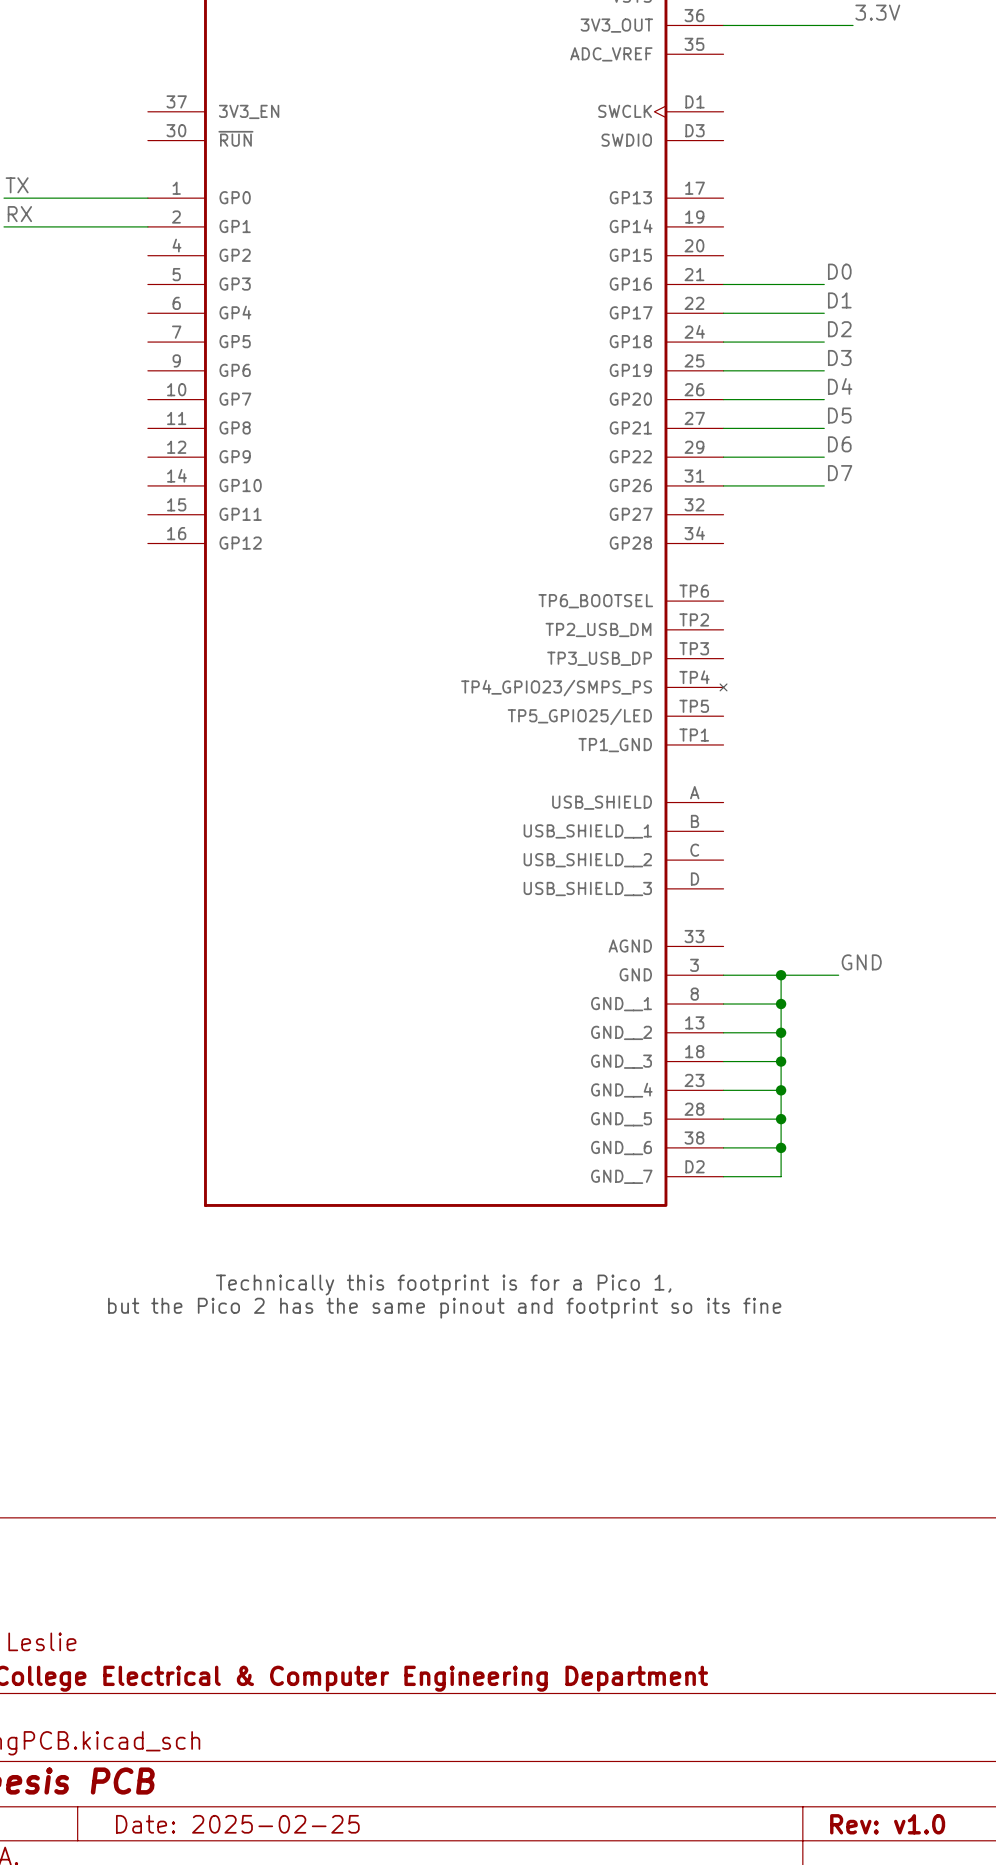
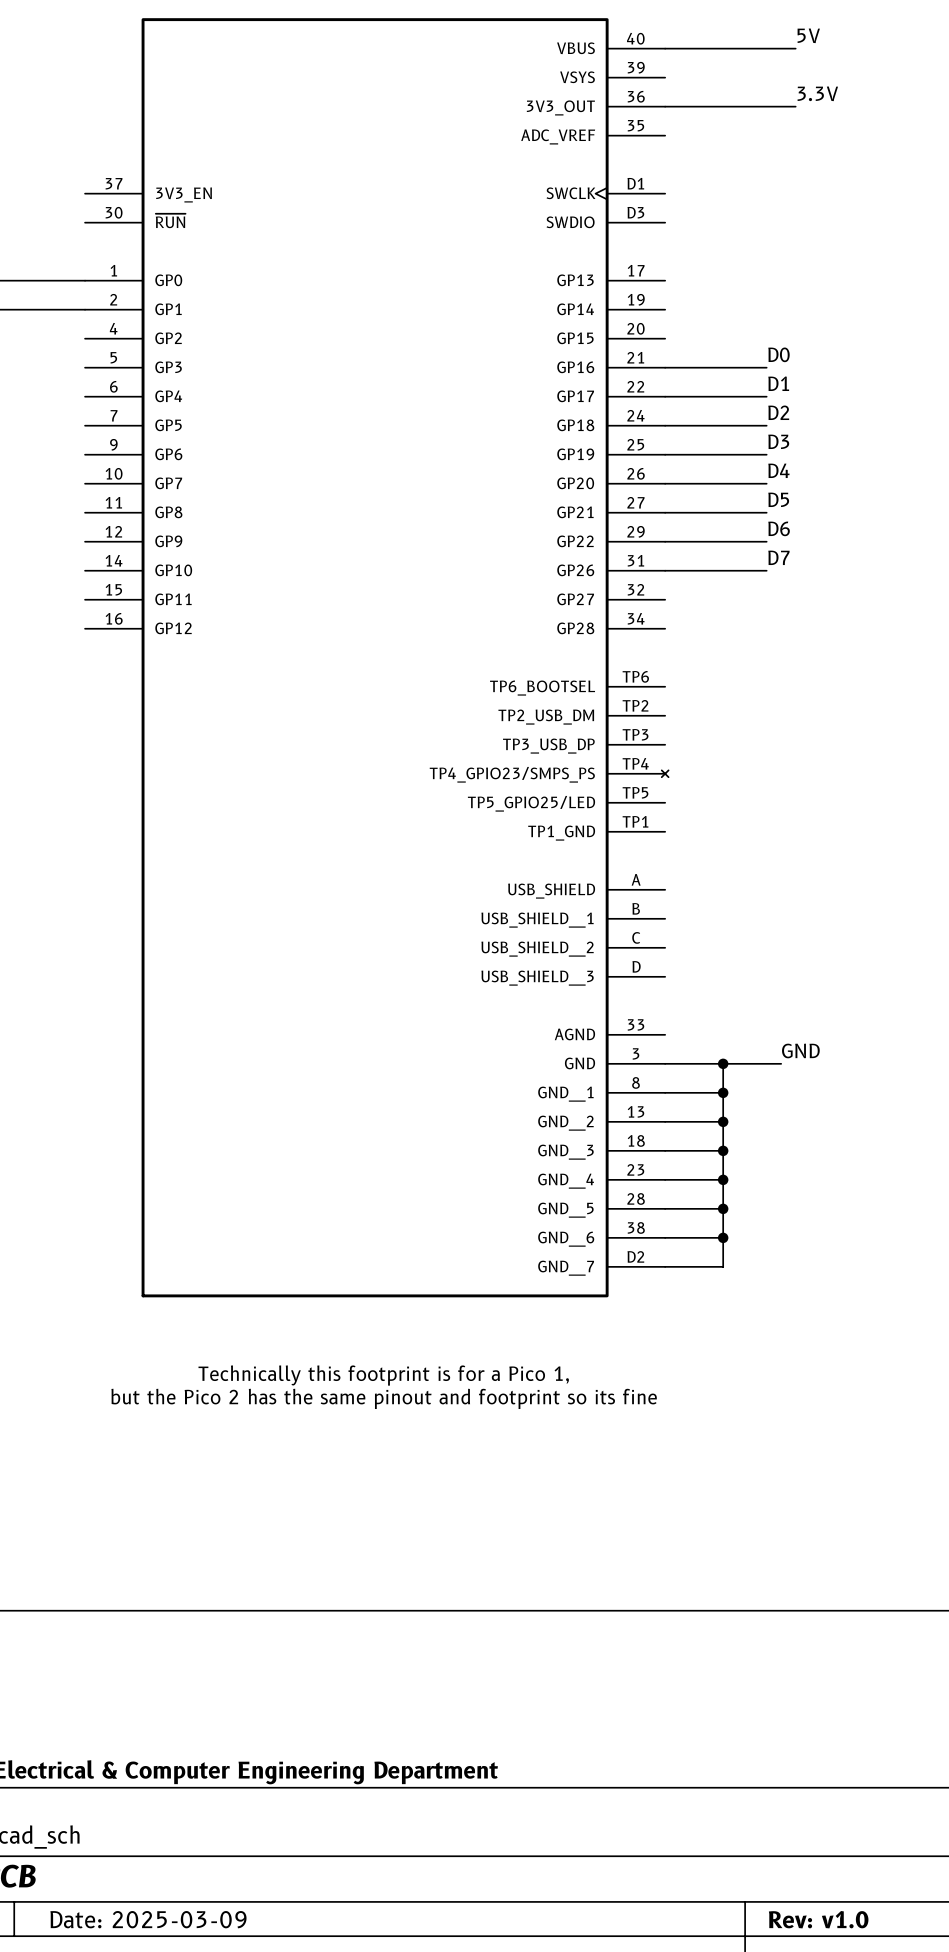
title block: Date: 2025-02-25 (237, 1824) -> Date: 2025-03-09 (148, 1919)

